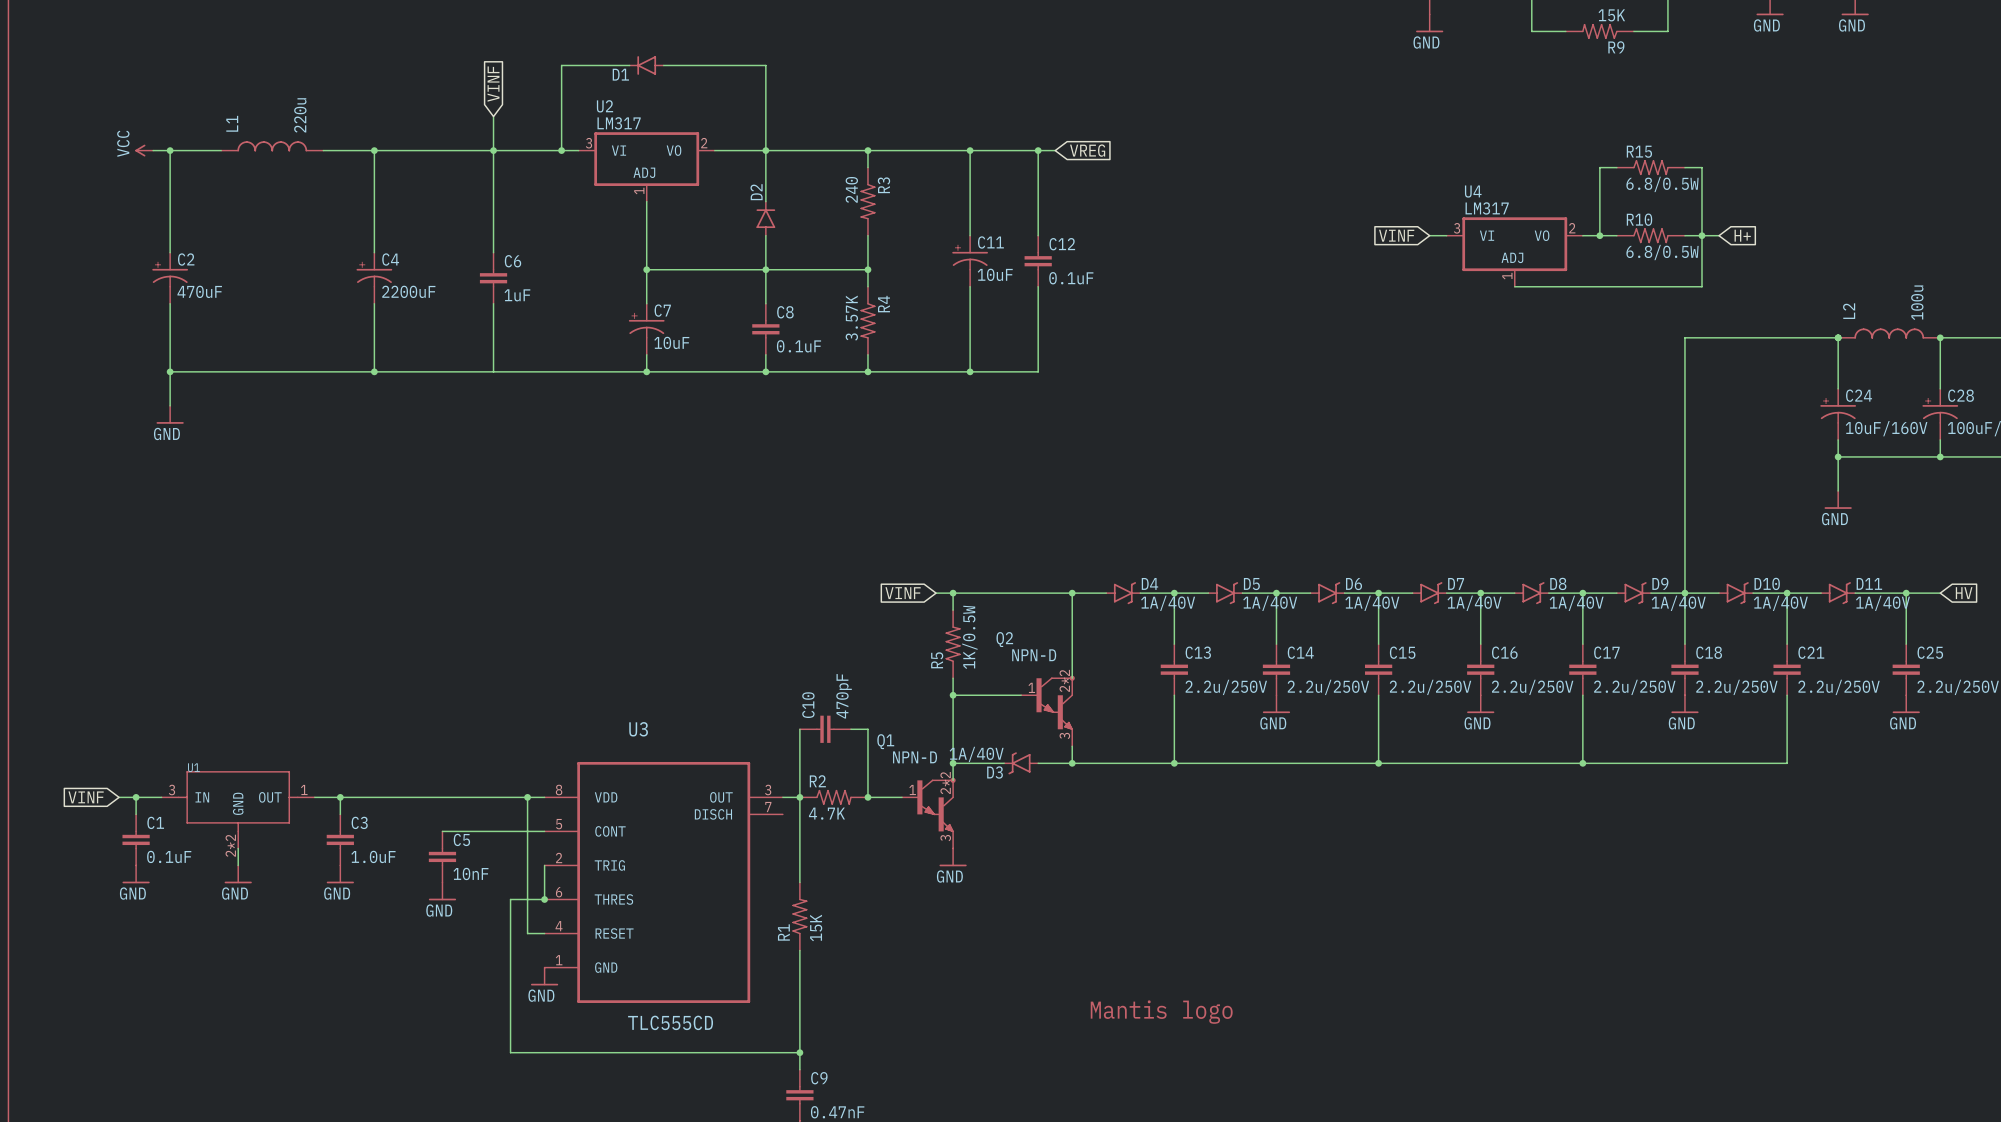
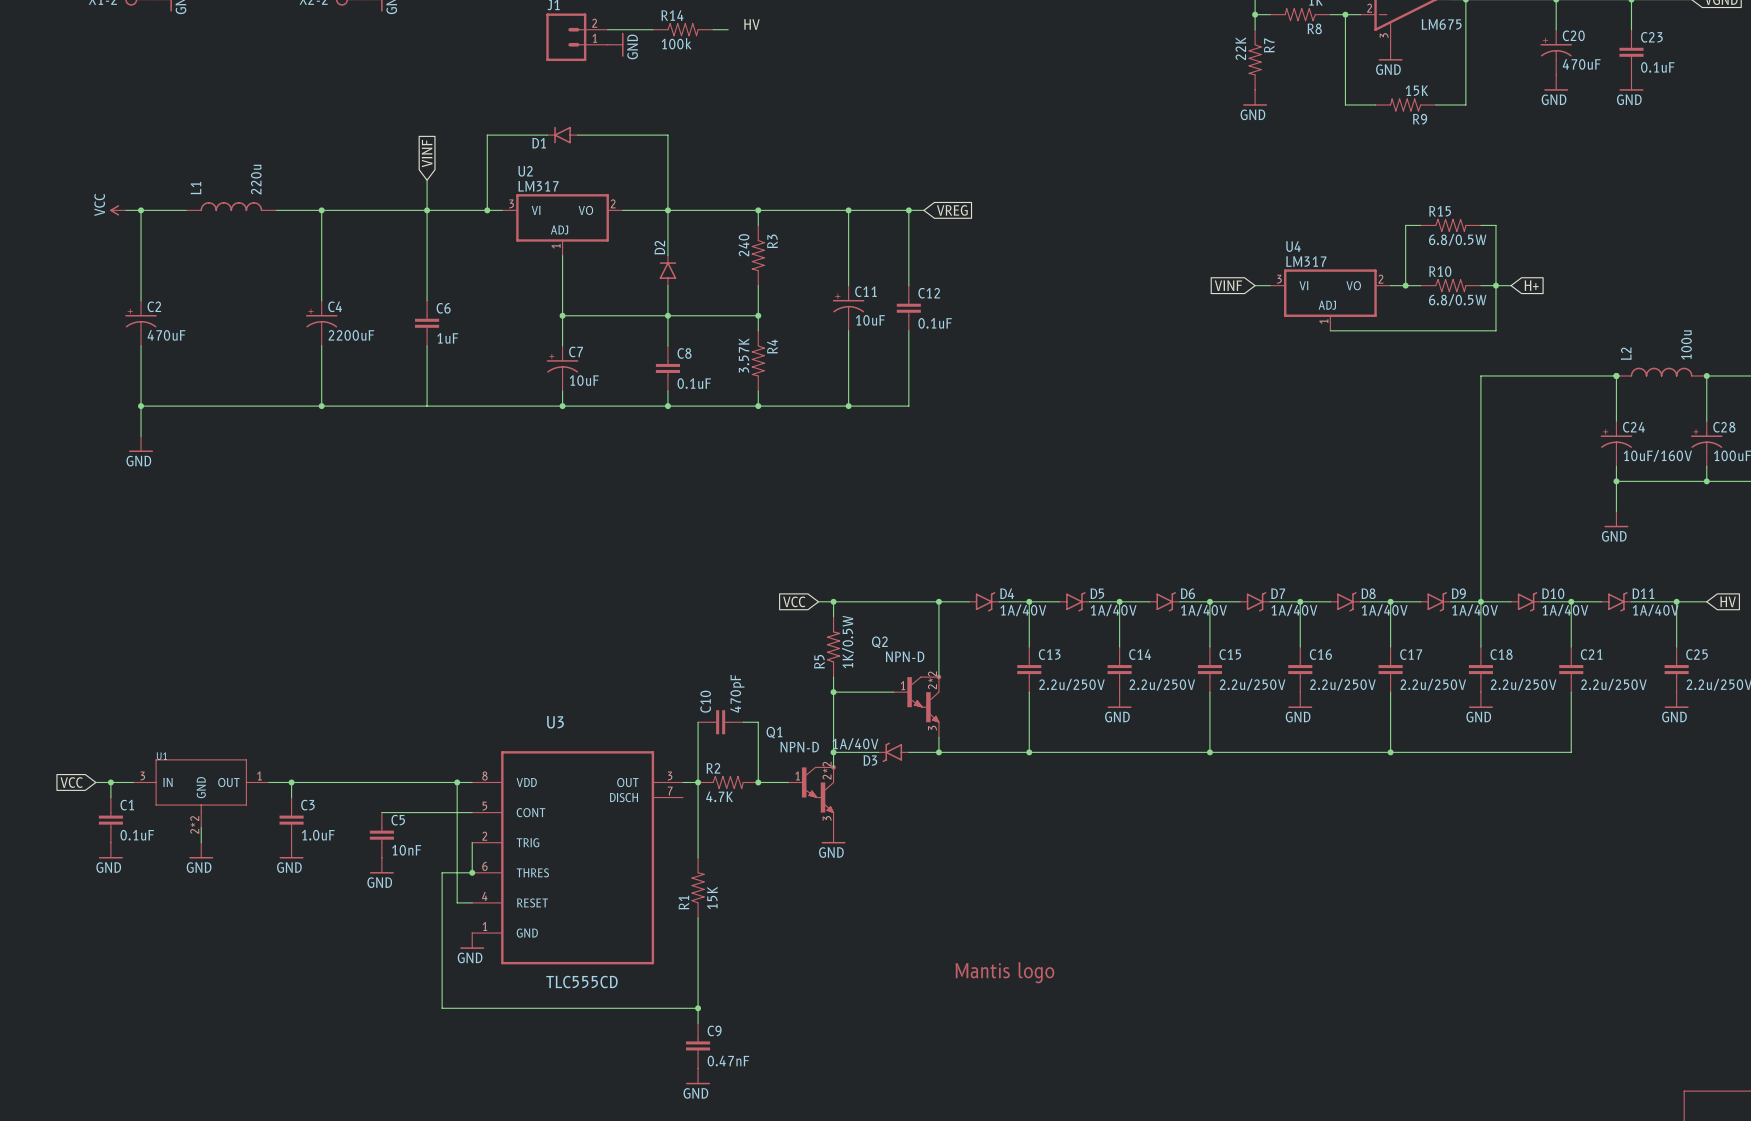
global label: VINF (903, 593) -> VCC (794, 601)
global label: VINF (86, 797) -> VCC (71, 782)

